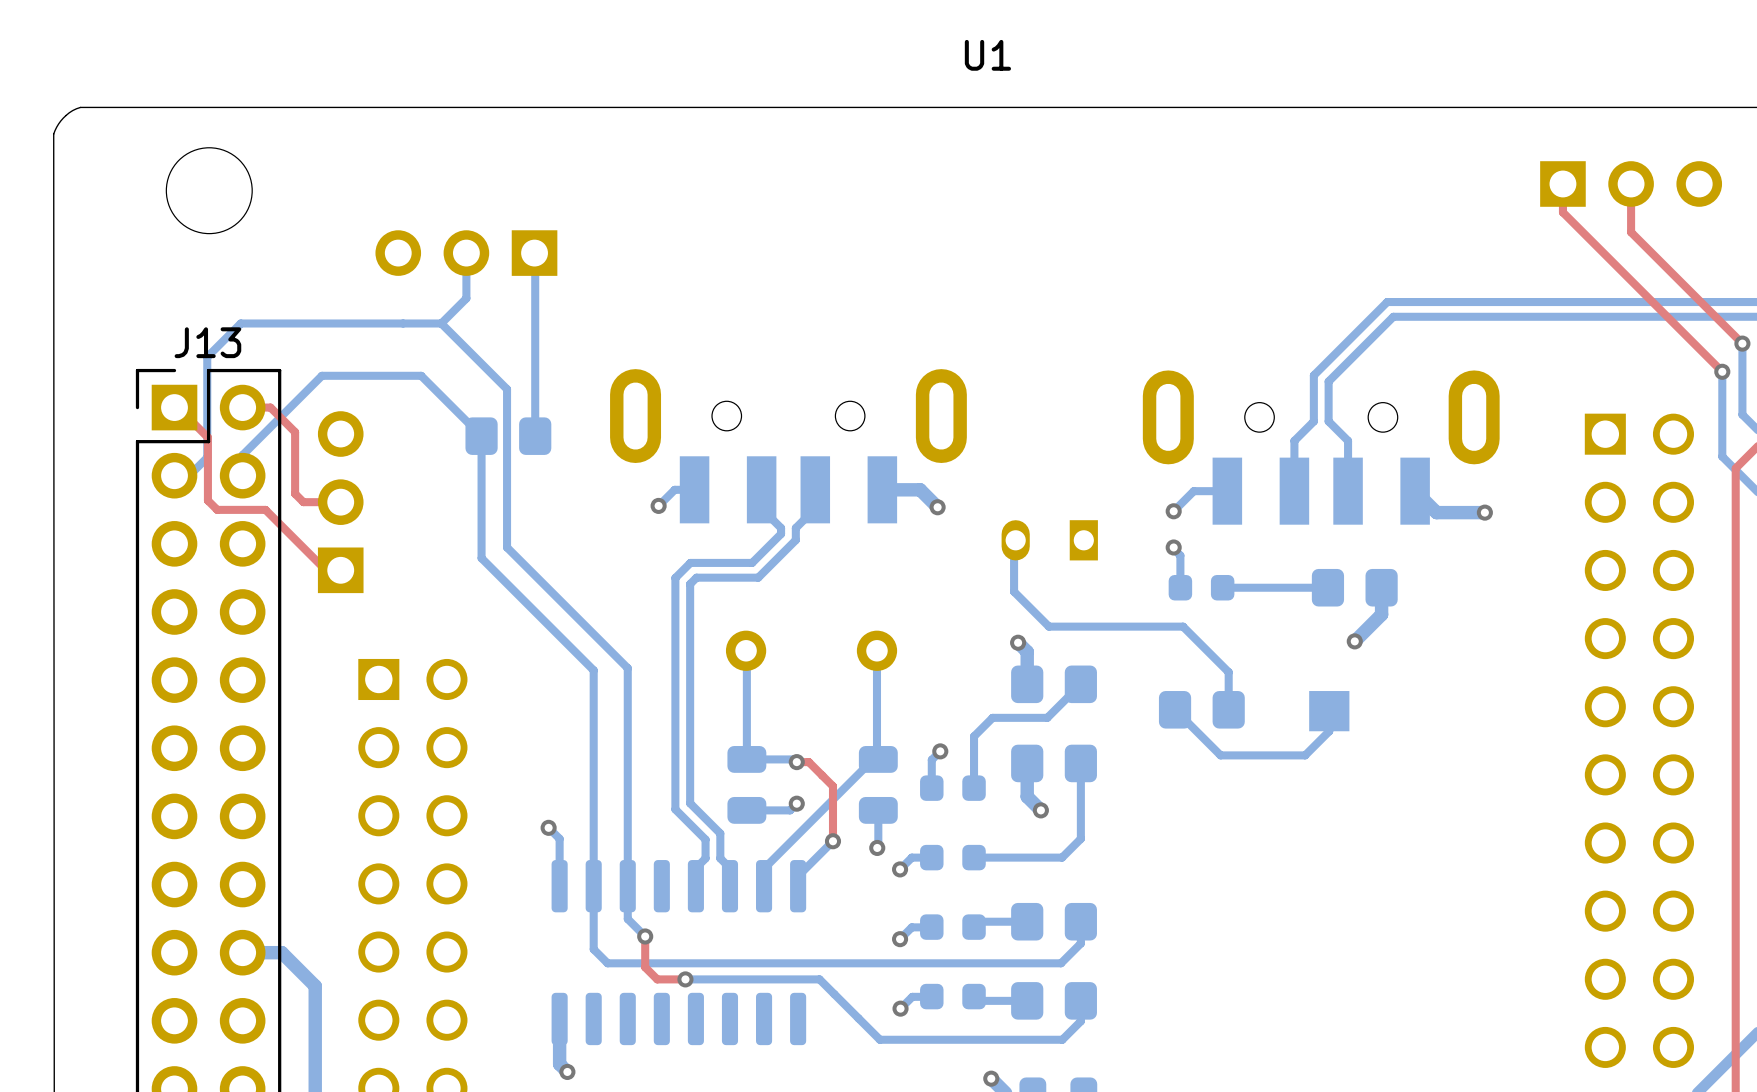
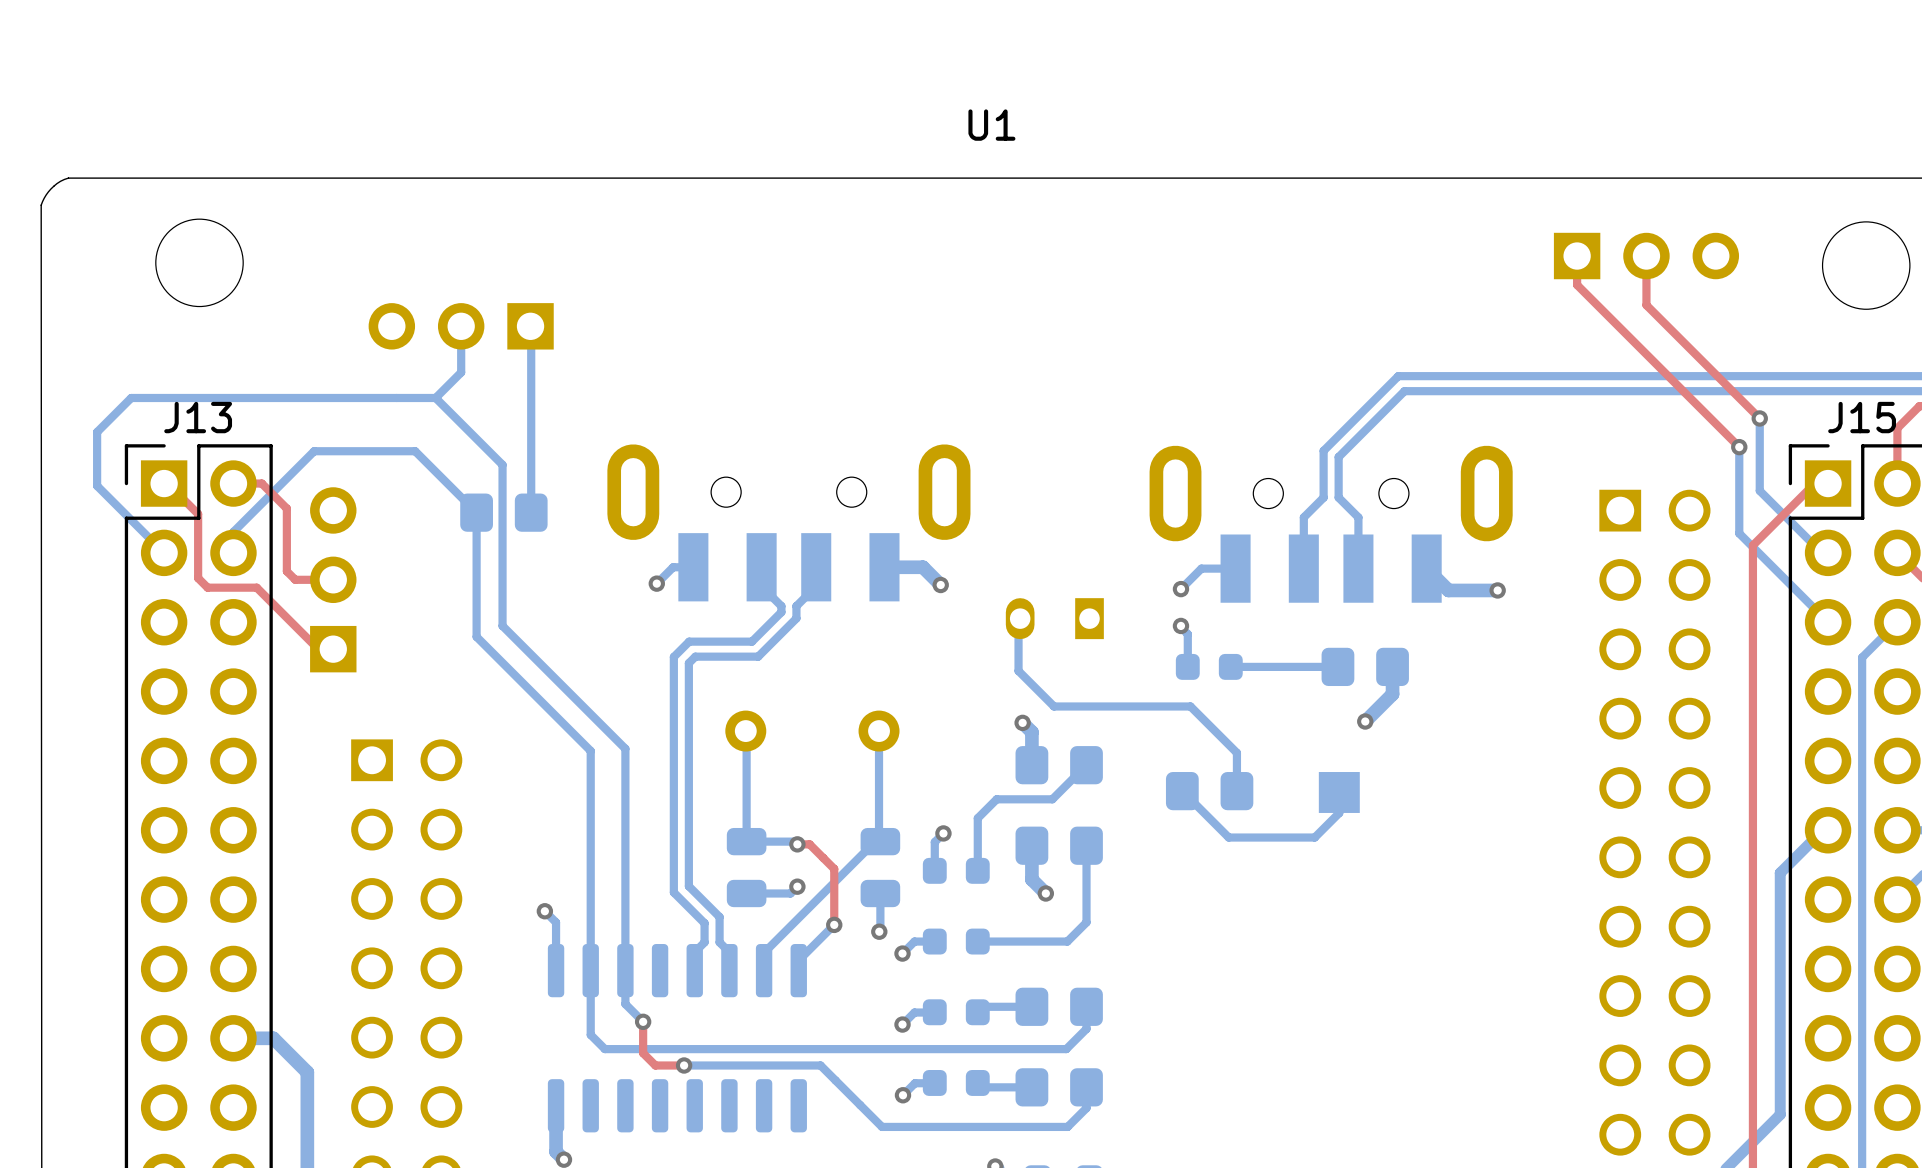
bottom track: (240, 323) (207, 357) (207, 457) (187, 475) -> (231, 397) (131, 397) (97, 432) (97, 485) (164, 552)

